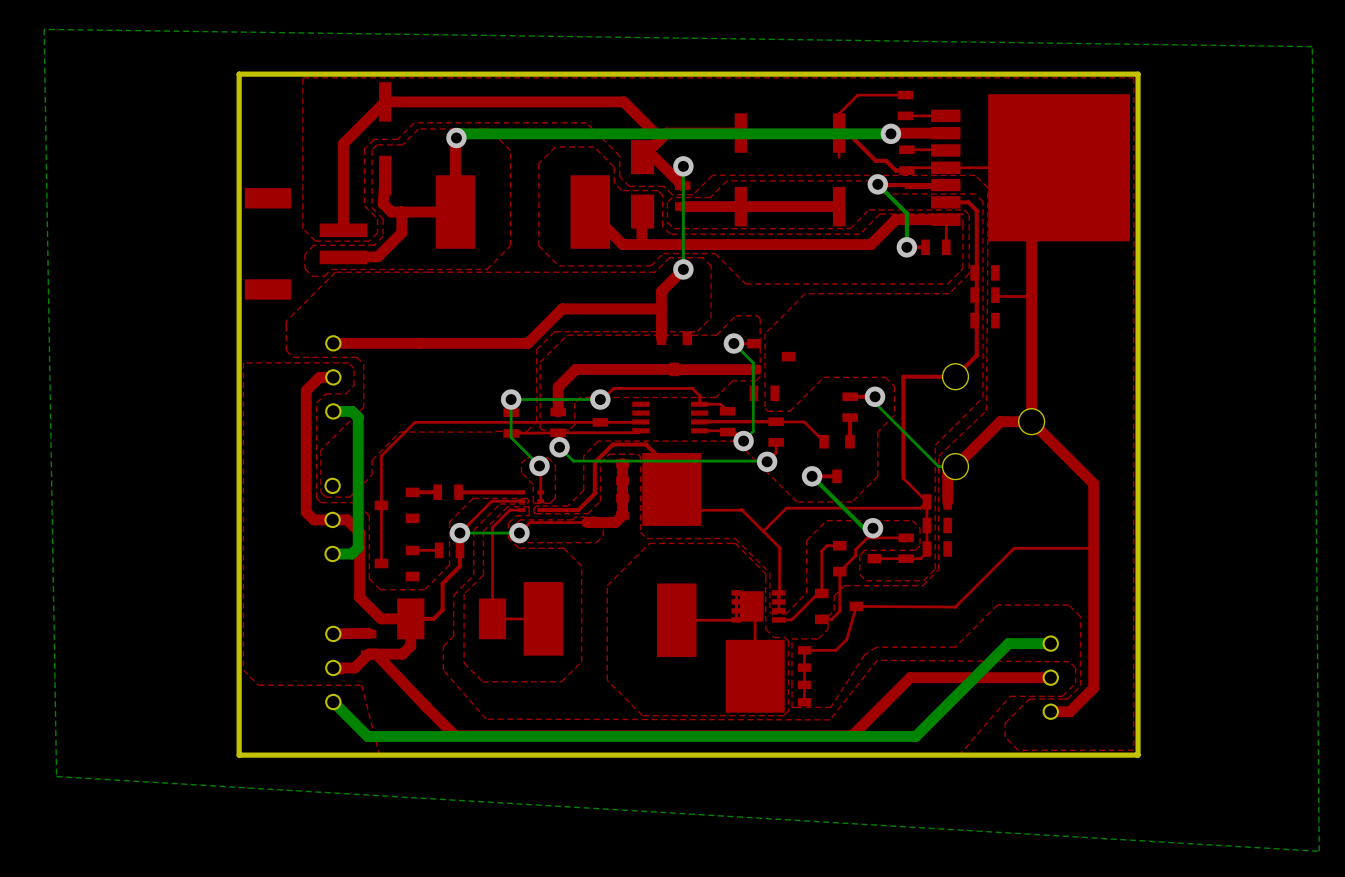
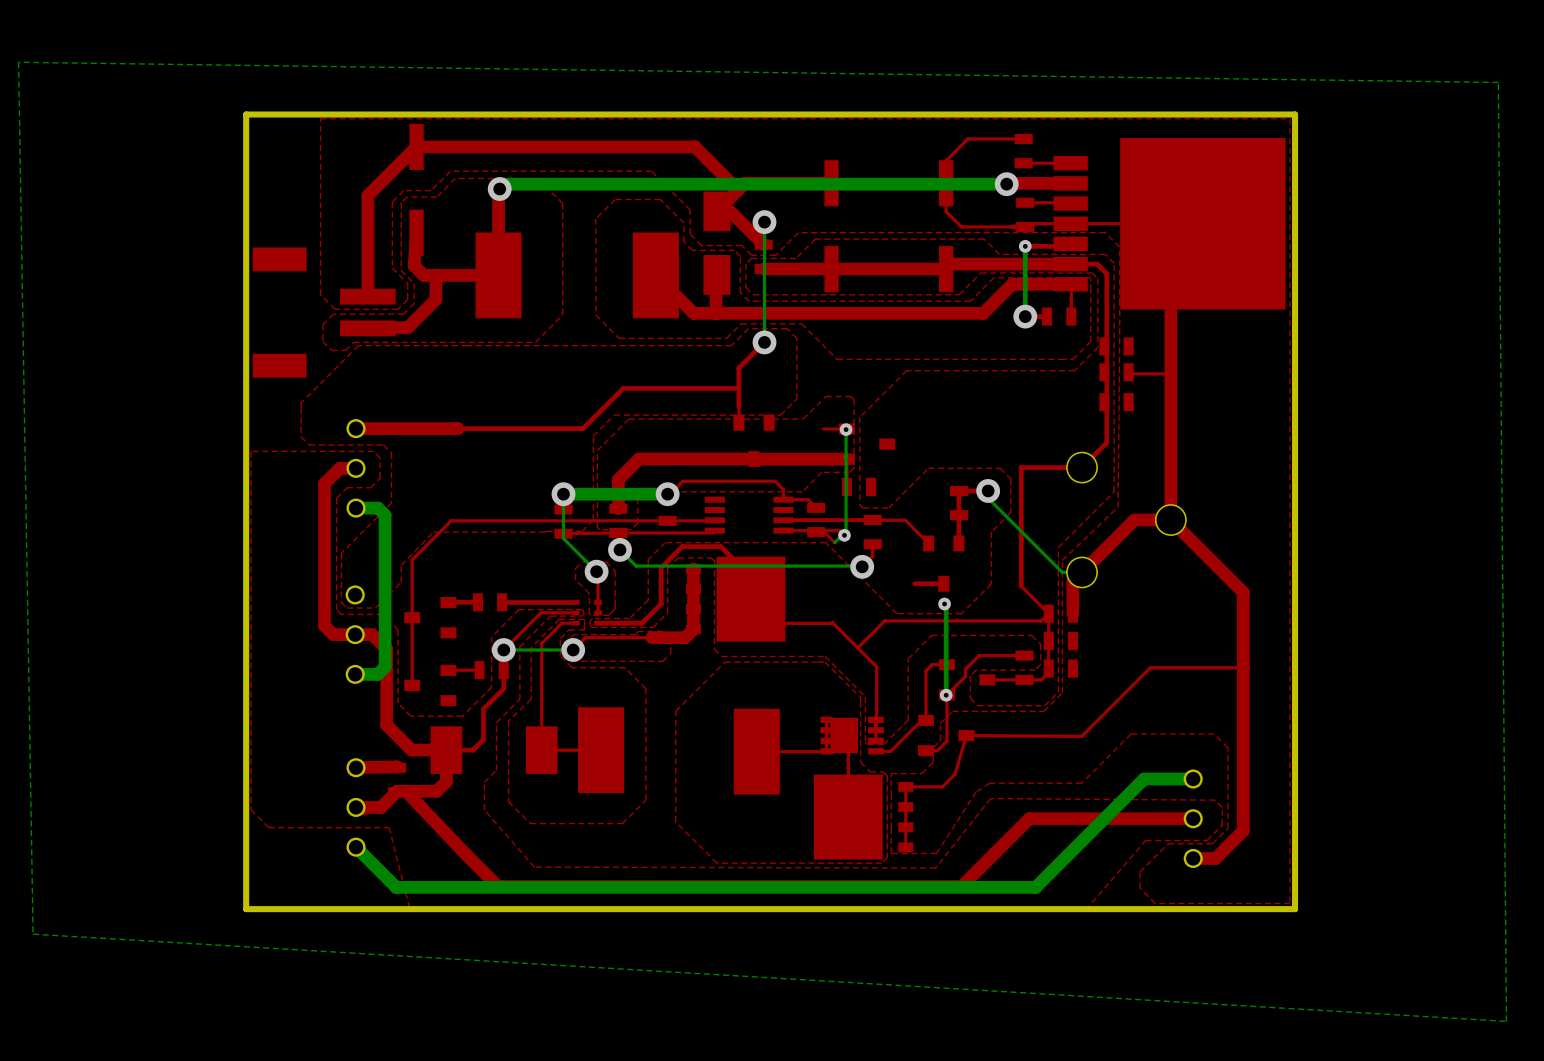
top track: (839, 133) (847, 133) (875, 160) (886, 160) (895, 170) -> (946, 211) (961, 226) (1012, 226)
top track: (877, 184) (945, 185) -> none
bottom track: (877, 184) (906, 213) -> (1025, 246) (1025, 277)
via: (877, 184) -> none
via: none -> (1025, 246)
top track: none -> (1070, 264) (951, 264)
top track width: thick (683, 269) (661, 291) (661, 338) -> thin (764, 342) (738, 368) (738, 422)
top track width: thick (661, 308) (562, 308) (527, 343) (420, 343) -> thin (738, 388) (623, 388) (583, 428) (457, 428)
bottom track: (733, 343) (753, 362) -> (846, 429) (846, 451)
via: (733, 343) -> none
via: none -> (846, 429)
bottom track width: thin (600, 399) (511, 399) -> thick (667, 494) (563, 494)
top track: none -> (958, 493) (958, 515)
top track: none -> (814, 530) (839, 530) (844, 535)
via size: [733, 430, 754, 452] -> [838, 529, 851, 542]
bottom track: (812, 476) (863, 528) (872, 528) -> none
via: (812, 476) -> none
bottom track: none -> (944, 603) (946, 605) (946, 695)
via: none -> (944, 603)
via: (872, 528) -> none
via: none -> (946, 695)

